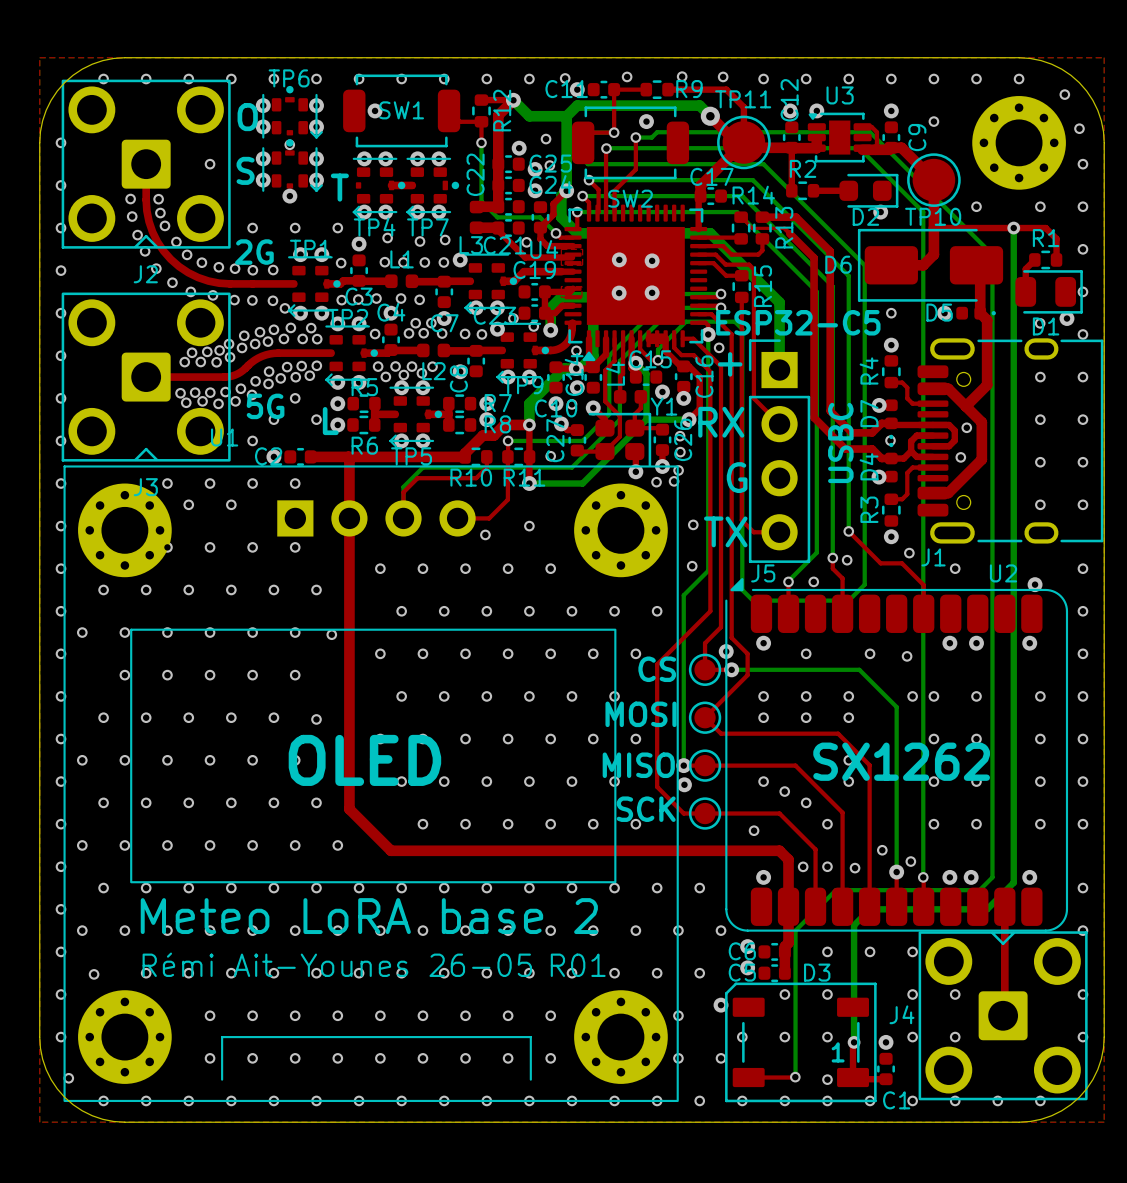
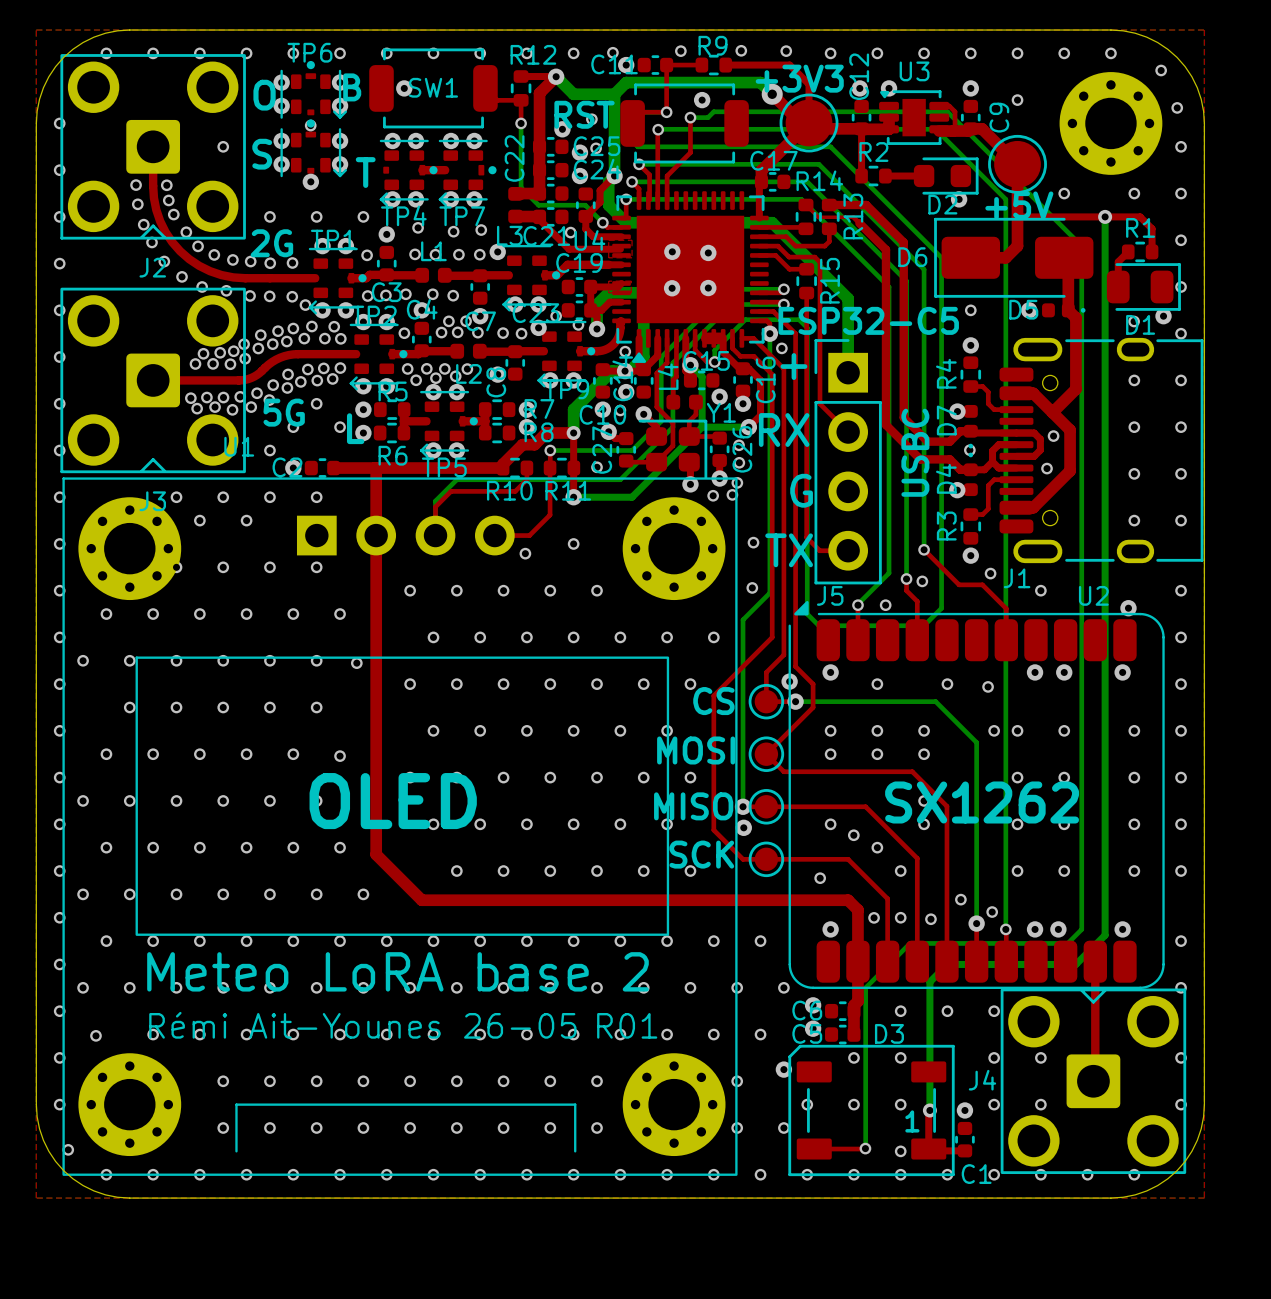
R9 name position: R9 (689, 89) -> R9 (712, 45)
TP11 name: TP11 (743, 99) -> none
text: none -> +3V3 (799, 78)
text: none -> B (352, 87)
R12 name rotation: 0° (502, 110) -> 90° clockwise (533, 54)
text: none -> RST (584, 114)
SW2 name: SW2 (630, 198) -> none
TP10 name: TP10 (933, 216) -> none
text: none -> +5V (1019, 205)

